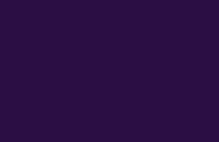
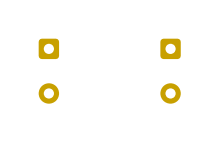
part: none -> (48, 71)
part: none -> (170, 71)

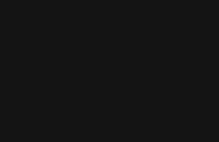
part: (48, 71) -> none
part: (170, 71) -> none

